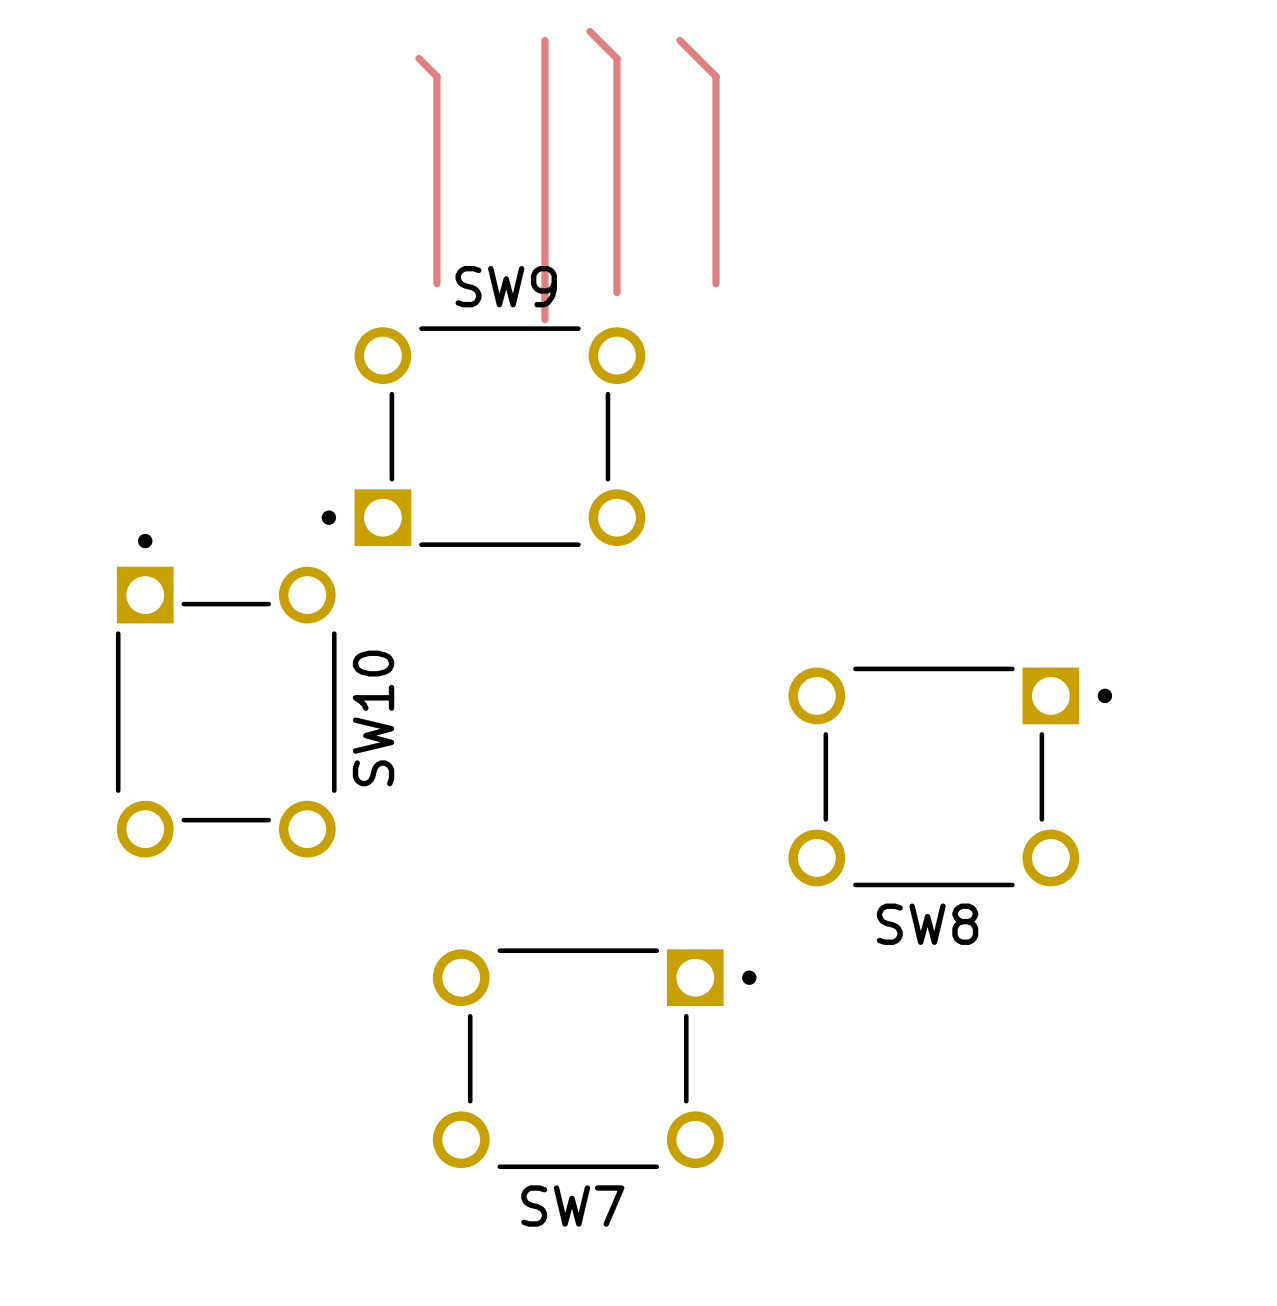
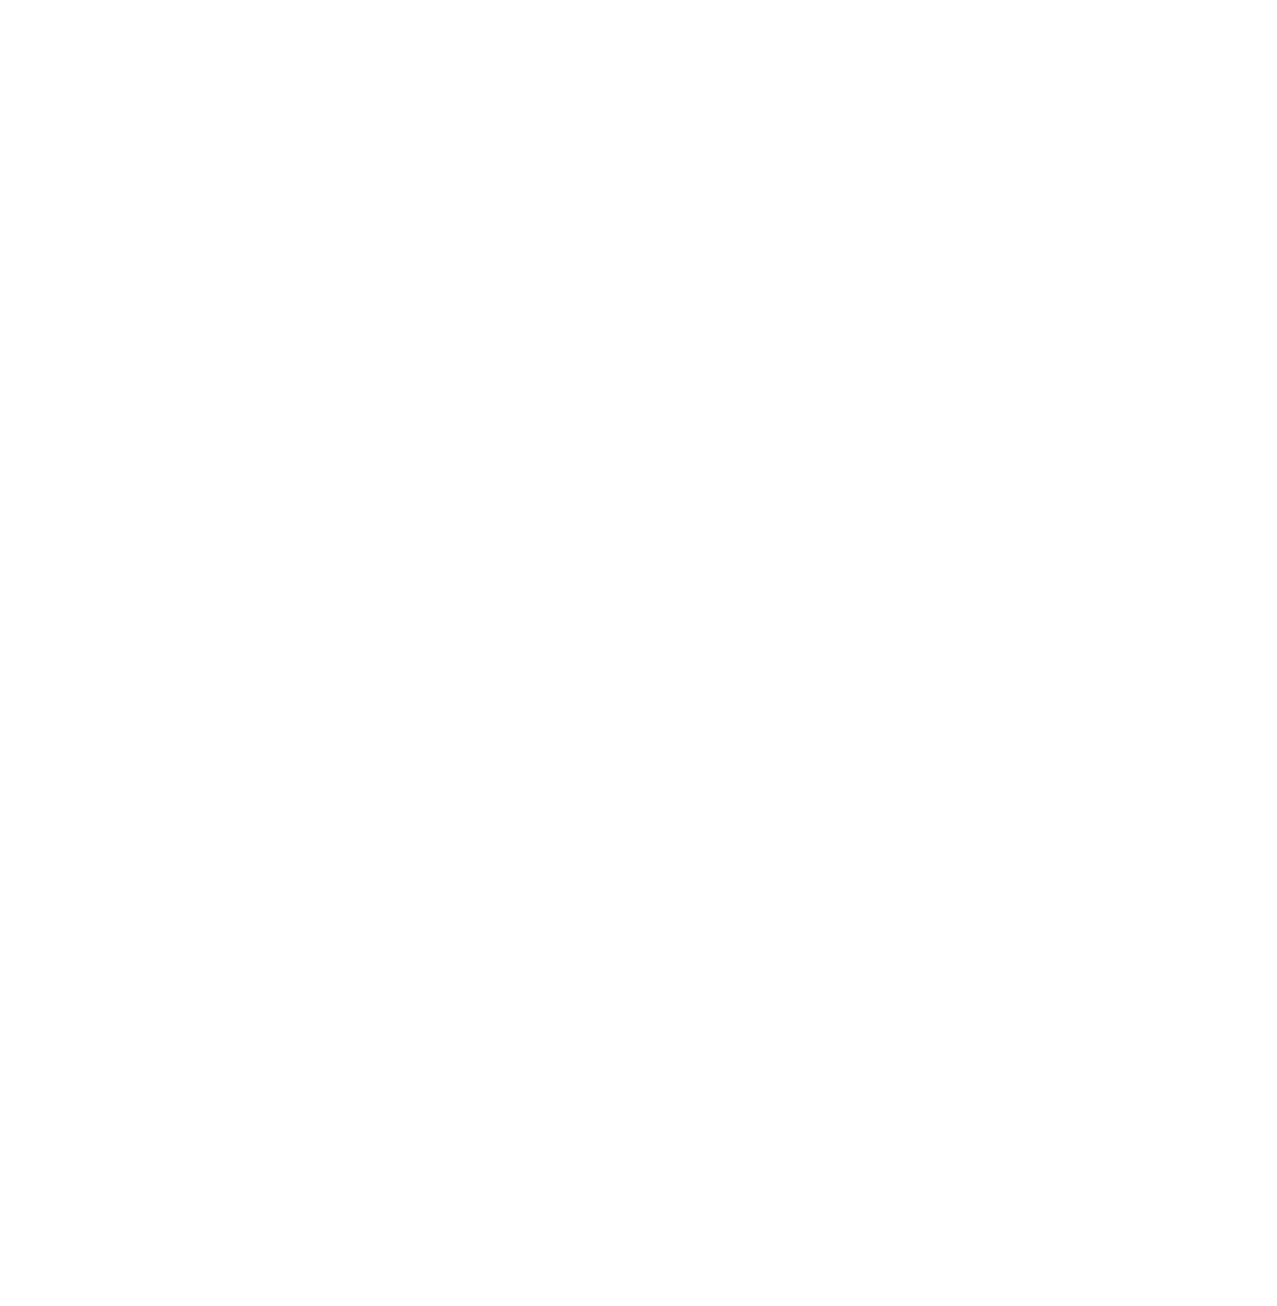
track: (589, 31) (616, 58) (616, 292) -> none
track: (544, 40) (544, 319) -> none
track: (679, 40) (715, 76) (715, 283) -> none
track: (418, 58) (436, 76) (436, 283) -> none
SW9: (483, 436) -> none
SW10: (226, 695) -> none
SW8: (950, 776) -> none
SW7: (594, 1058) -> none

